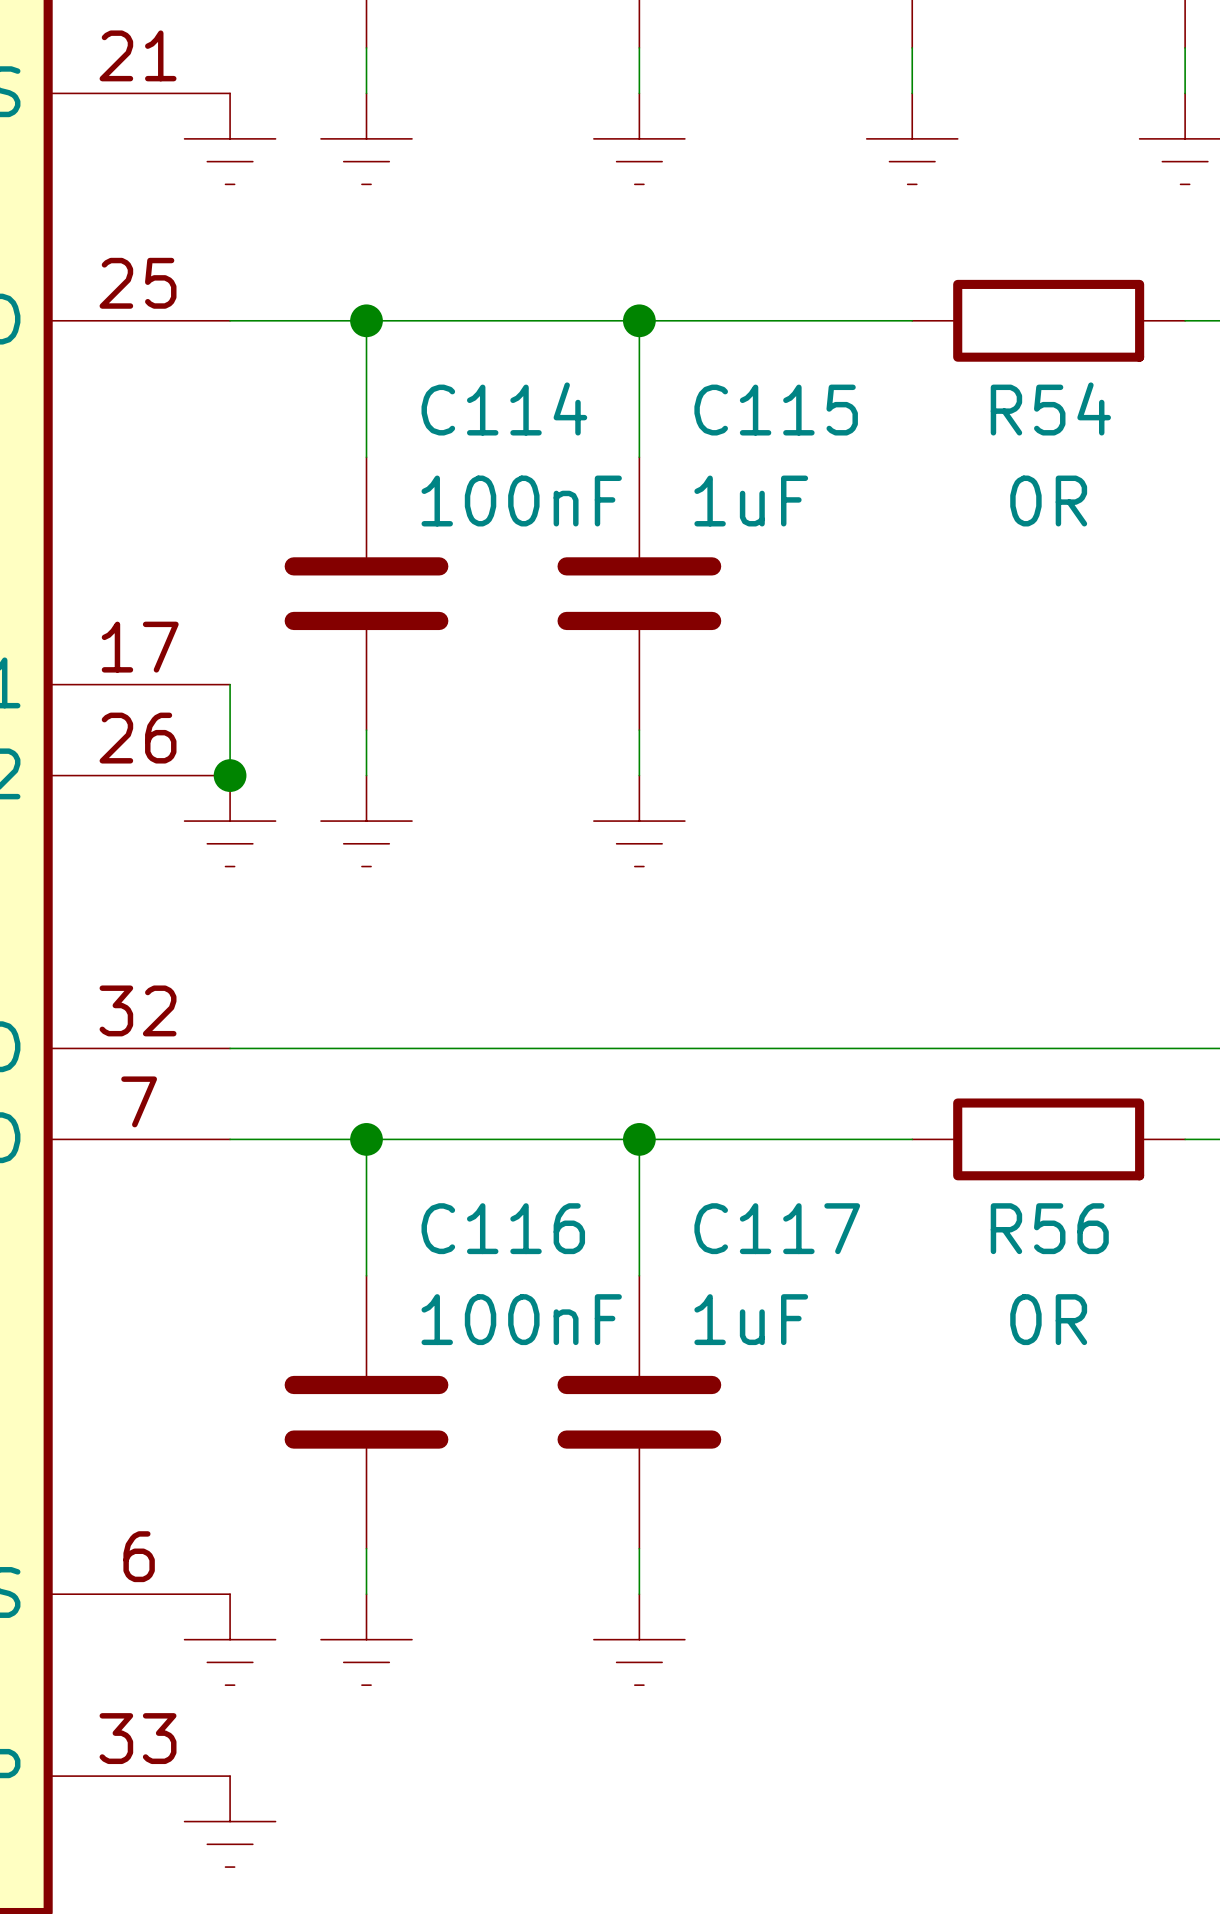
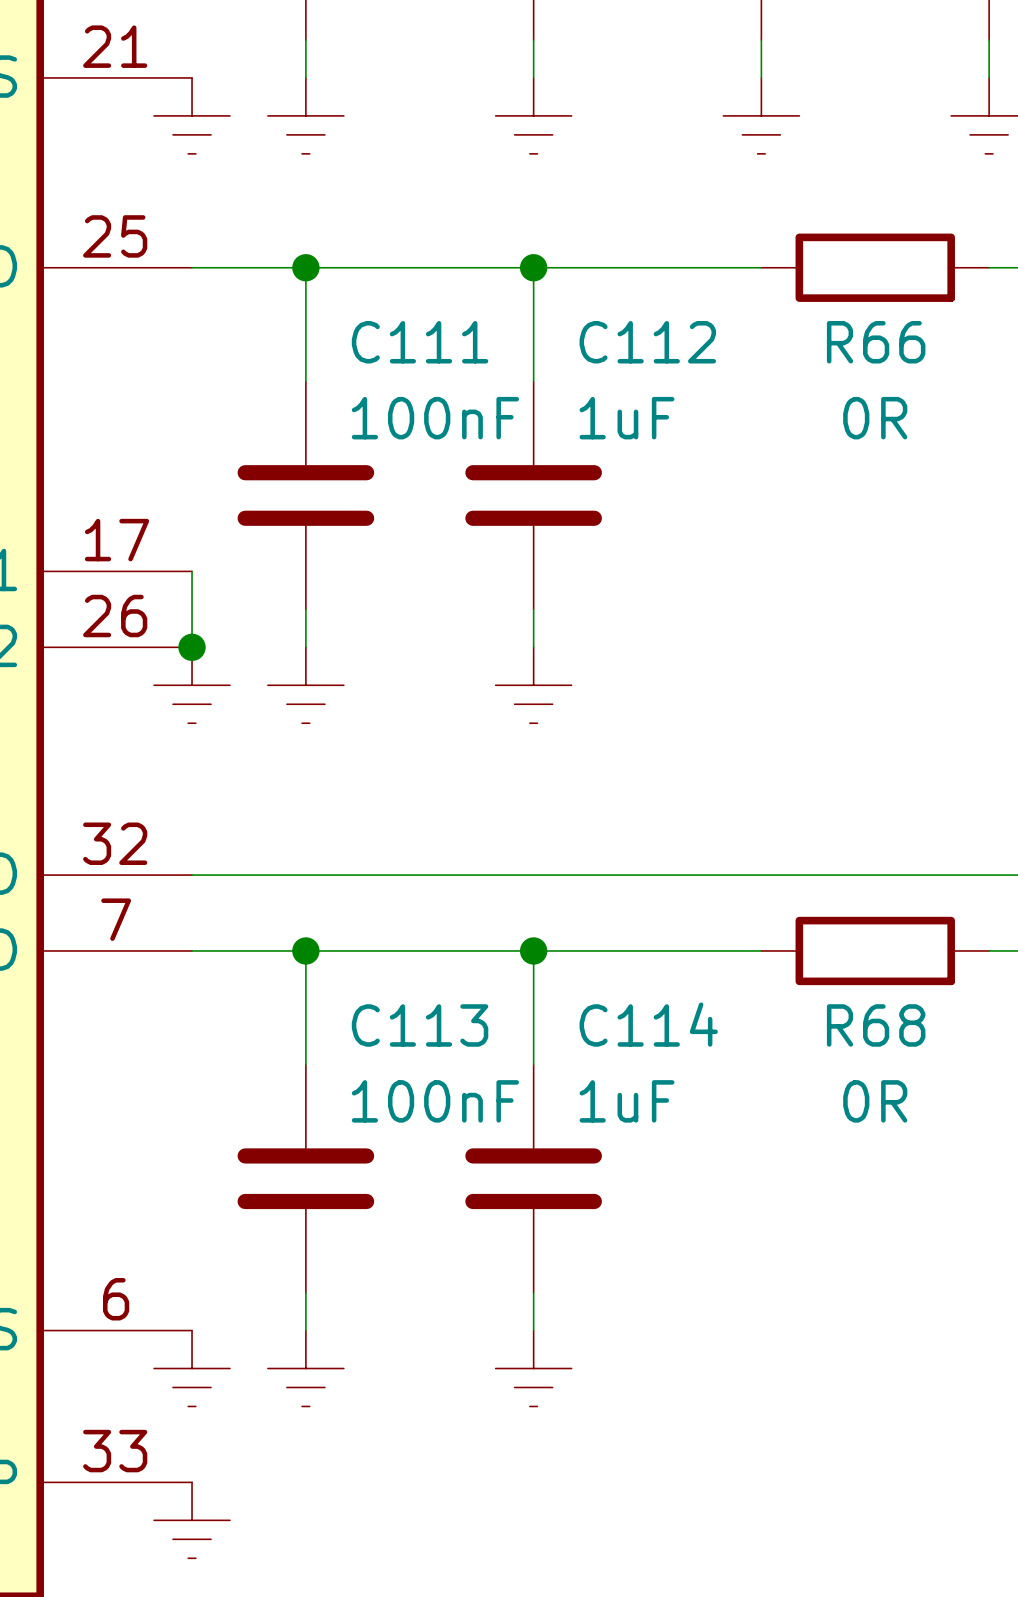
C114 name: C114 (504, 408) -> C111 (420, 342)
R54 name: R54 (1050, 408) -> R66 (876, 342)
C115 name: C115 (776, 410) -> C112 (647, 342)
C116 name: C116 (503, 1228) -> C113 (420, 1025)
C117 name: C117 (777, 1228) -> C114 (648, 1024)
R56 name: R56 (1049, 1228) -> R68 (876, 1025)

